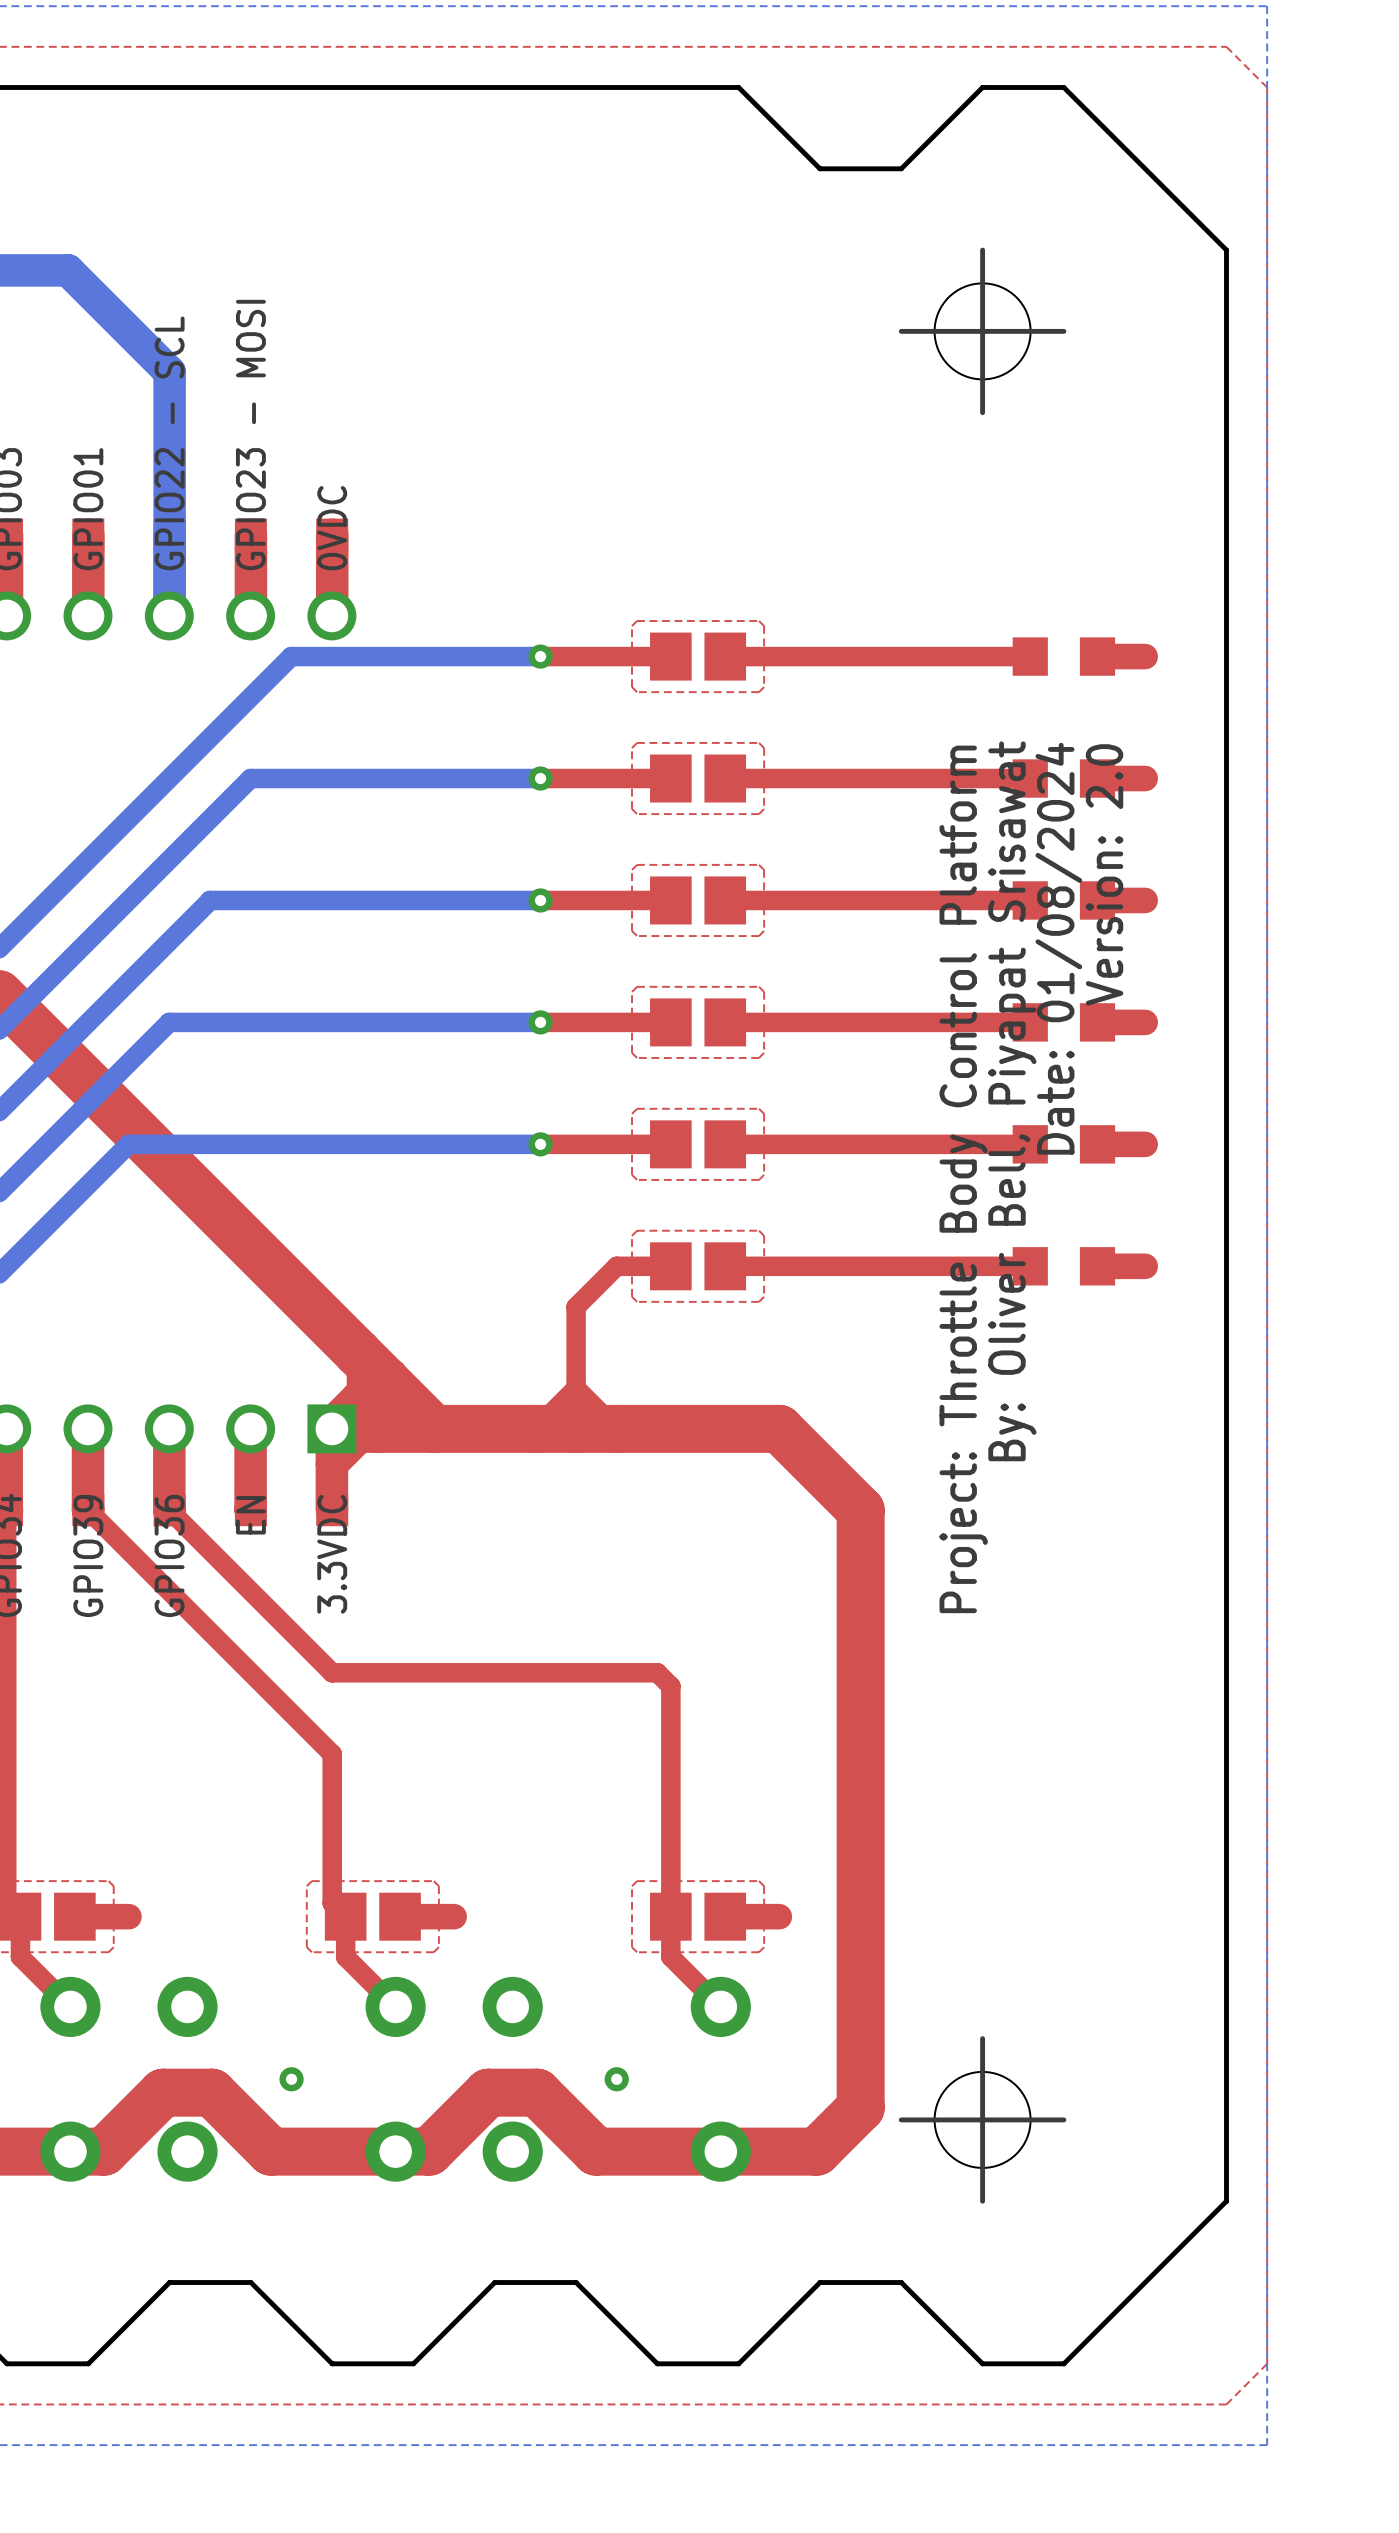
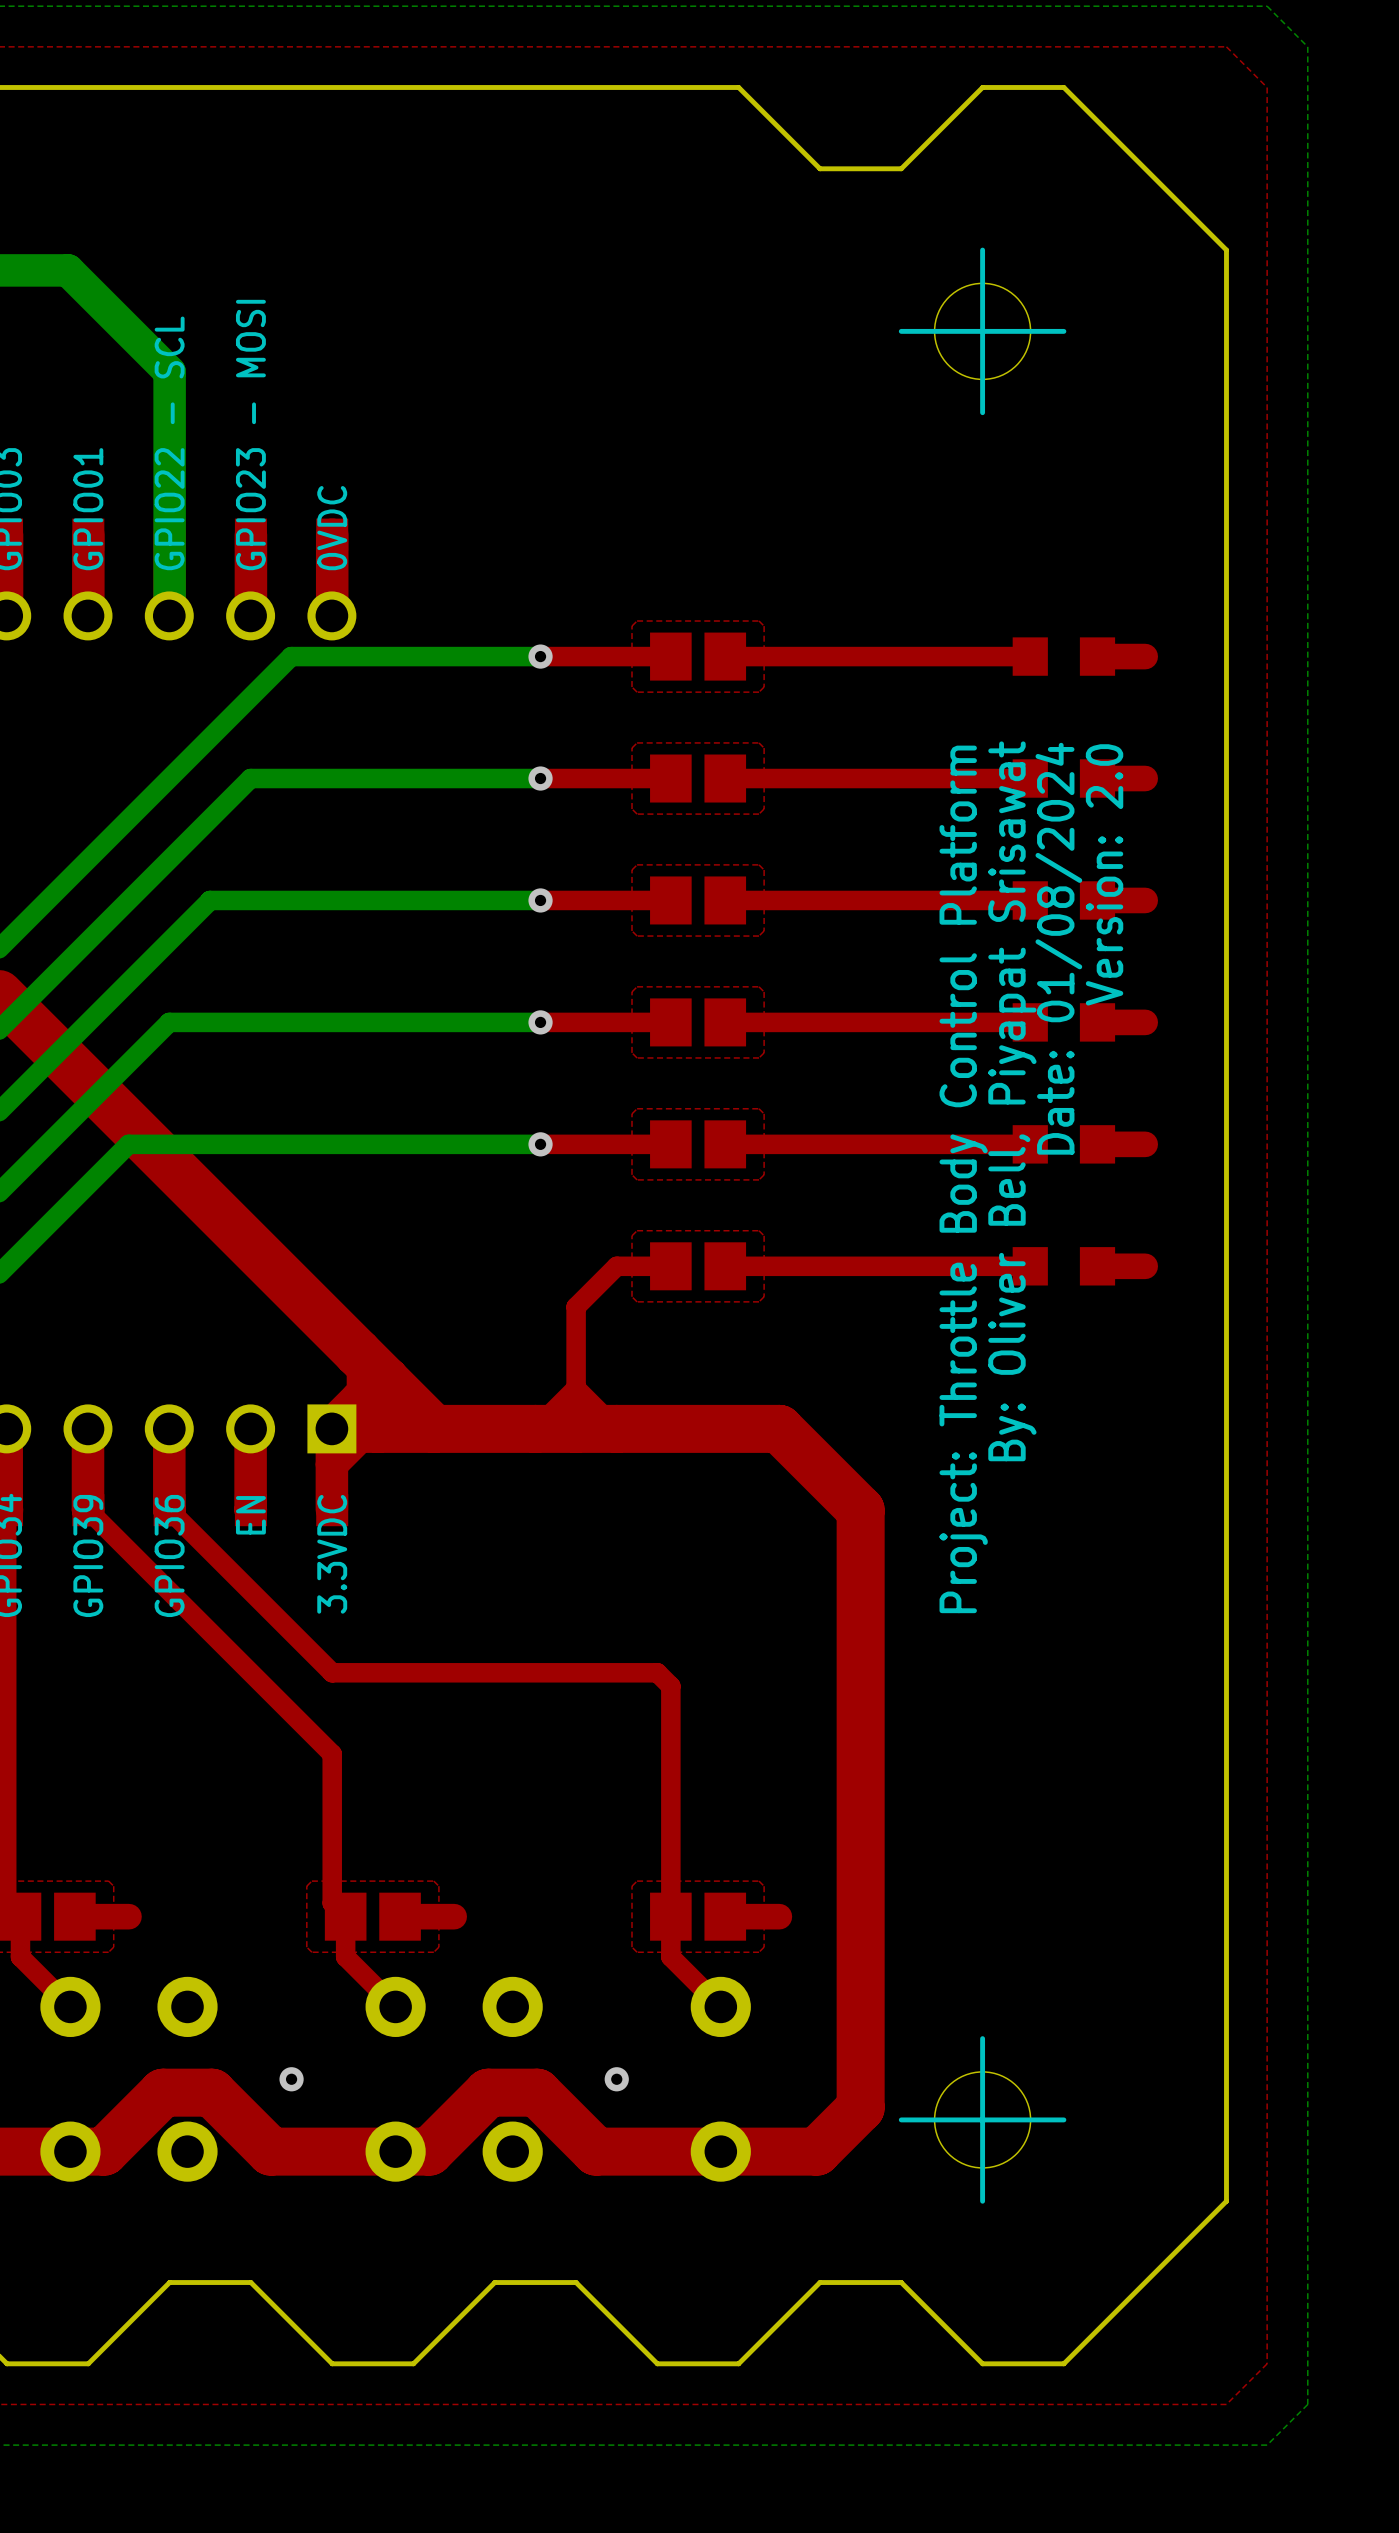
bottom zone outline: (1267, 6) (1267, 2445) -> (1267, 6) (1307, 46) (1307, 2404) (1267, 2445)

